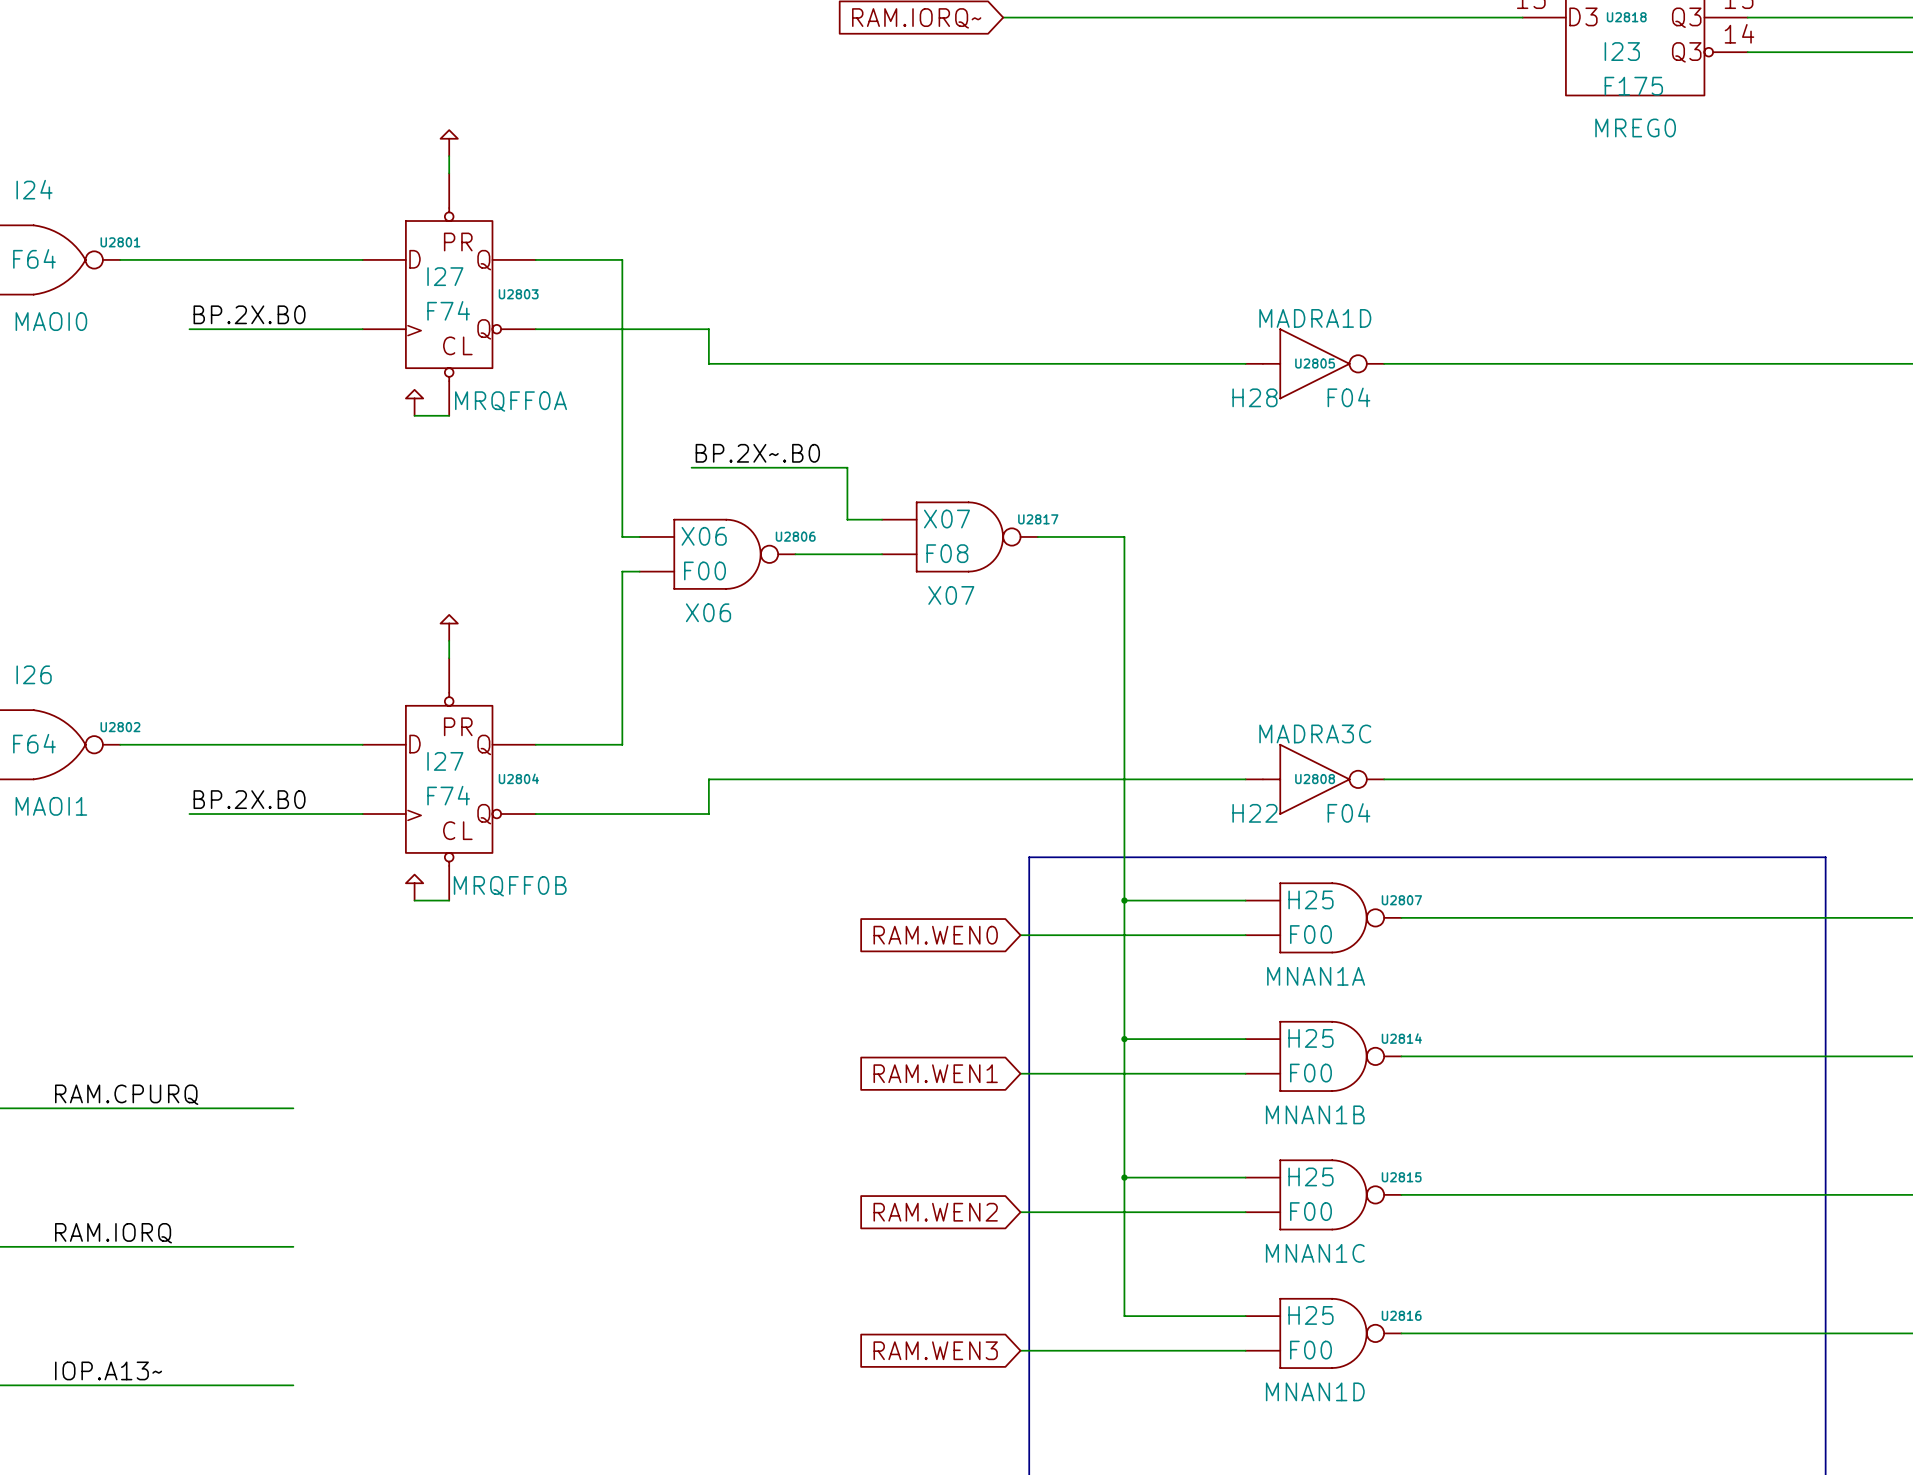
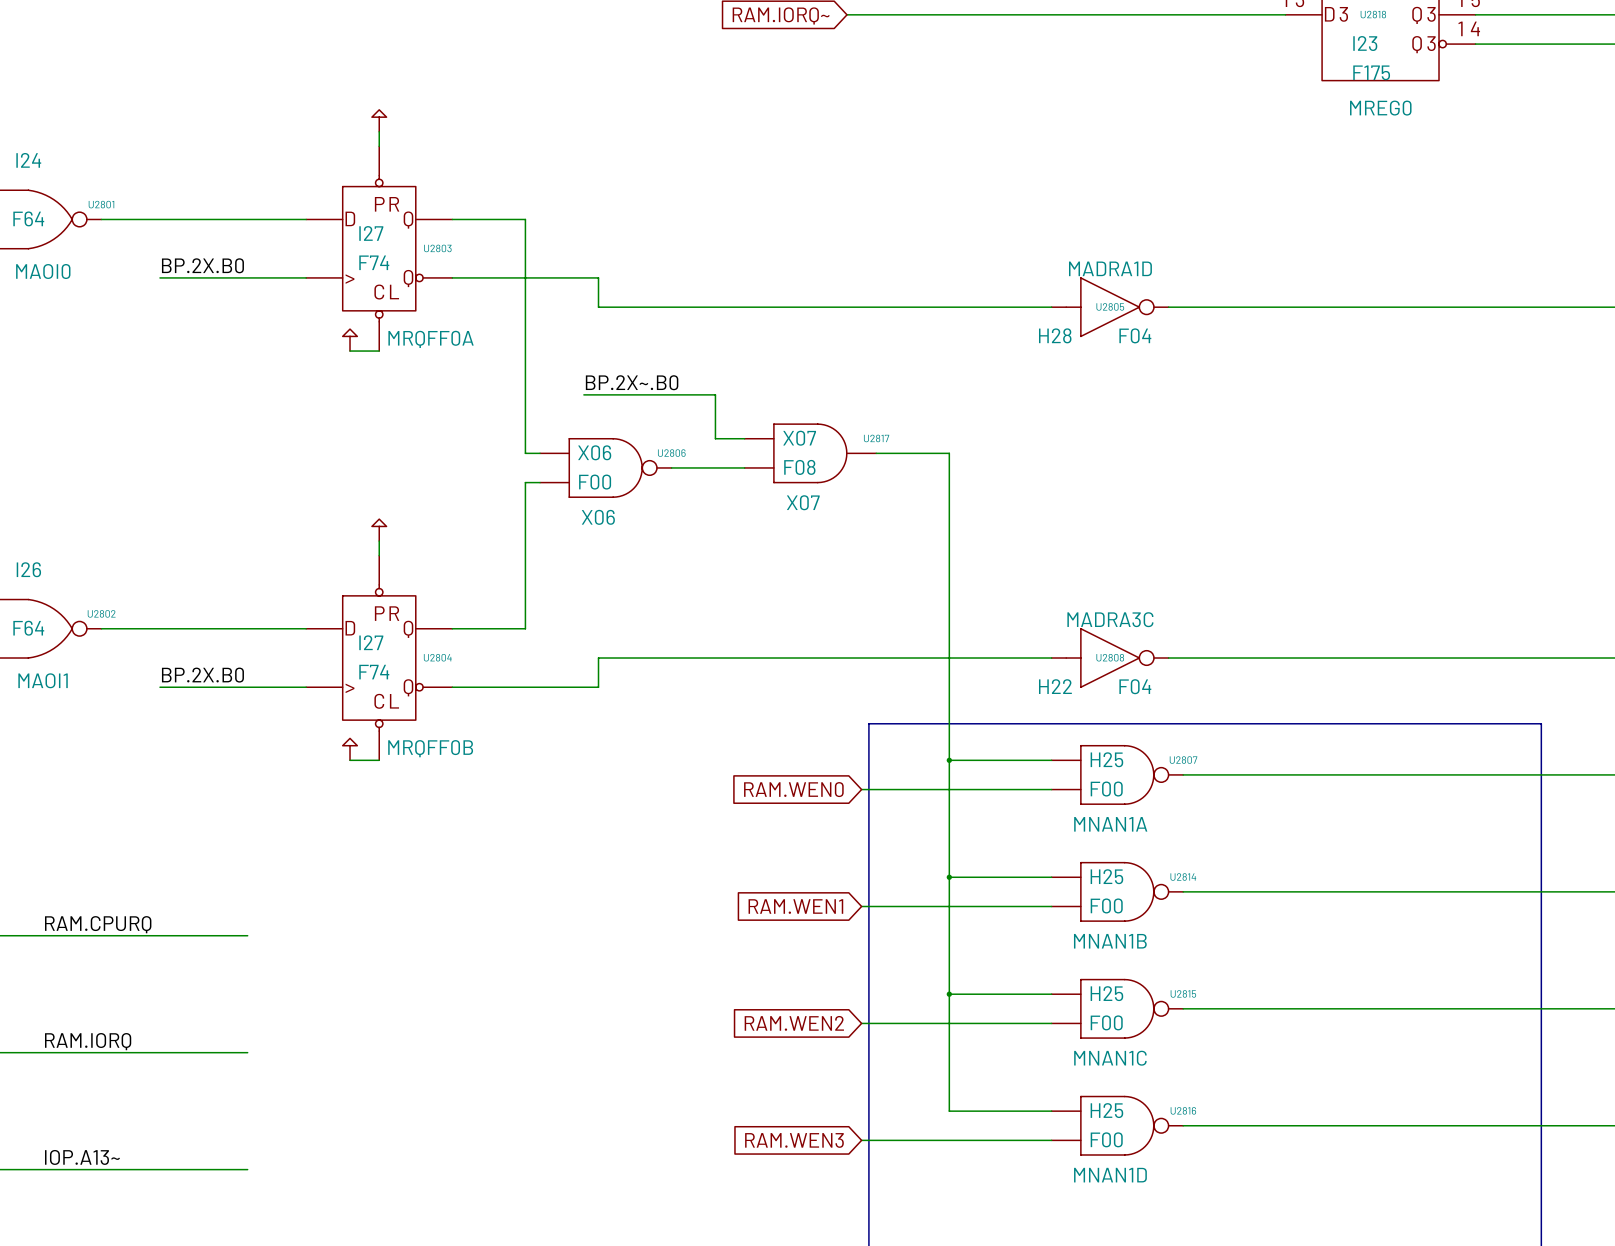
U2817 symbol: [882, 501, 1038, 573] -> [744, 423, 877, 484]

